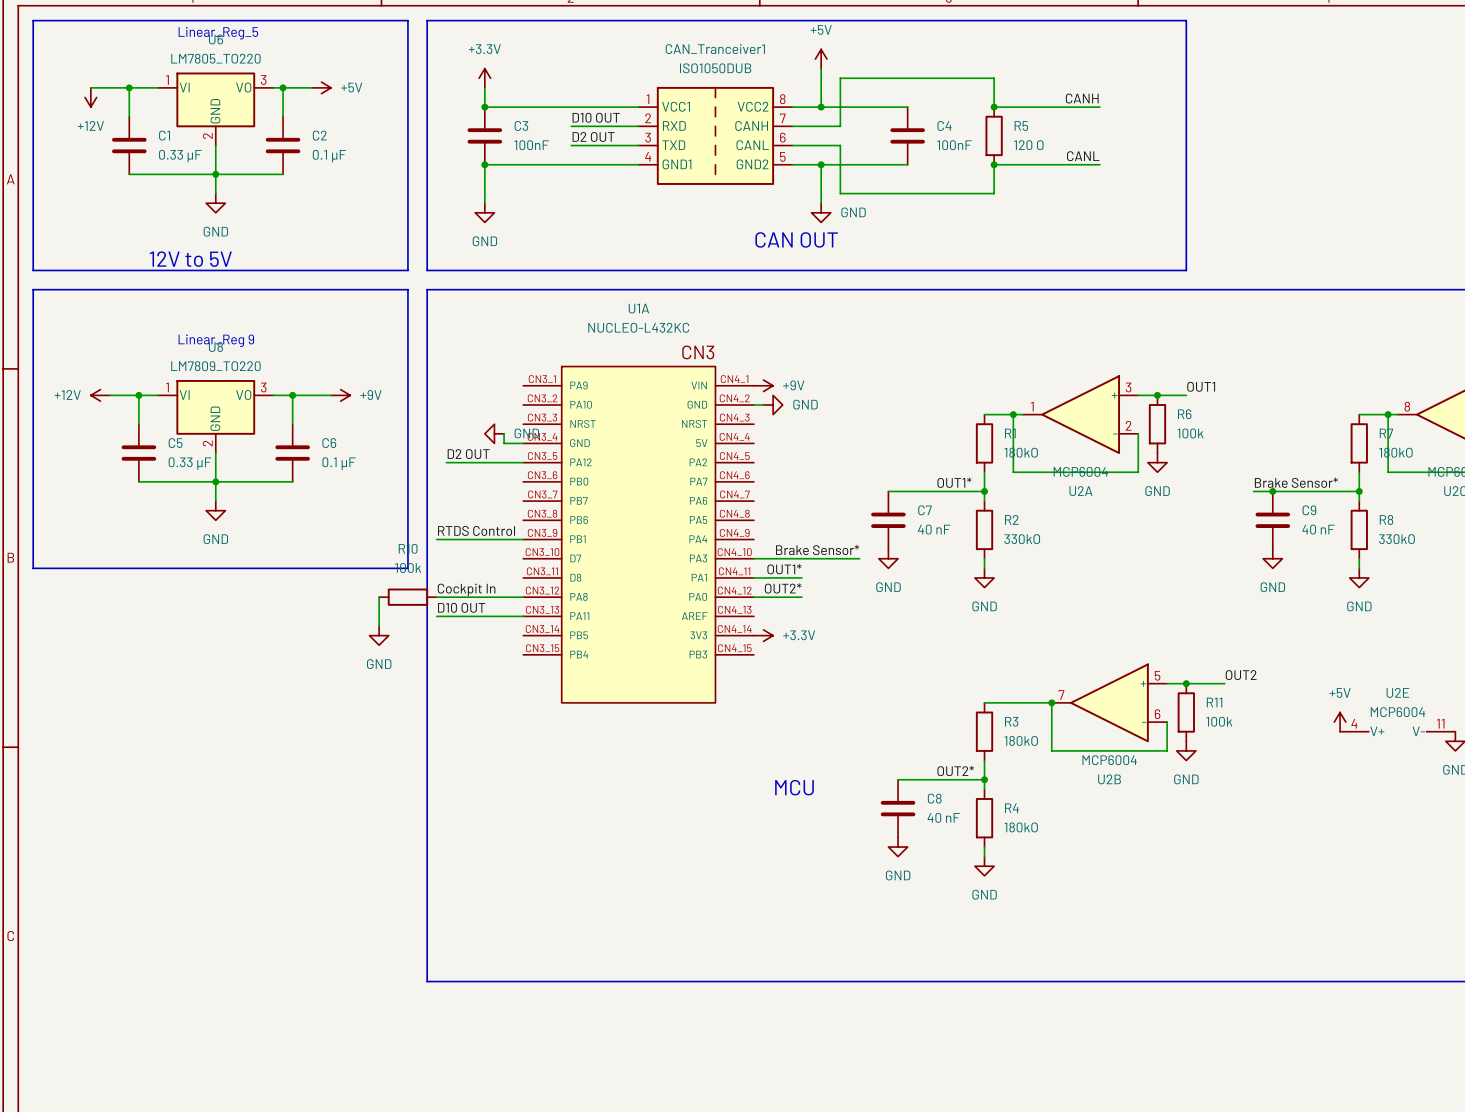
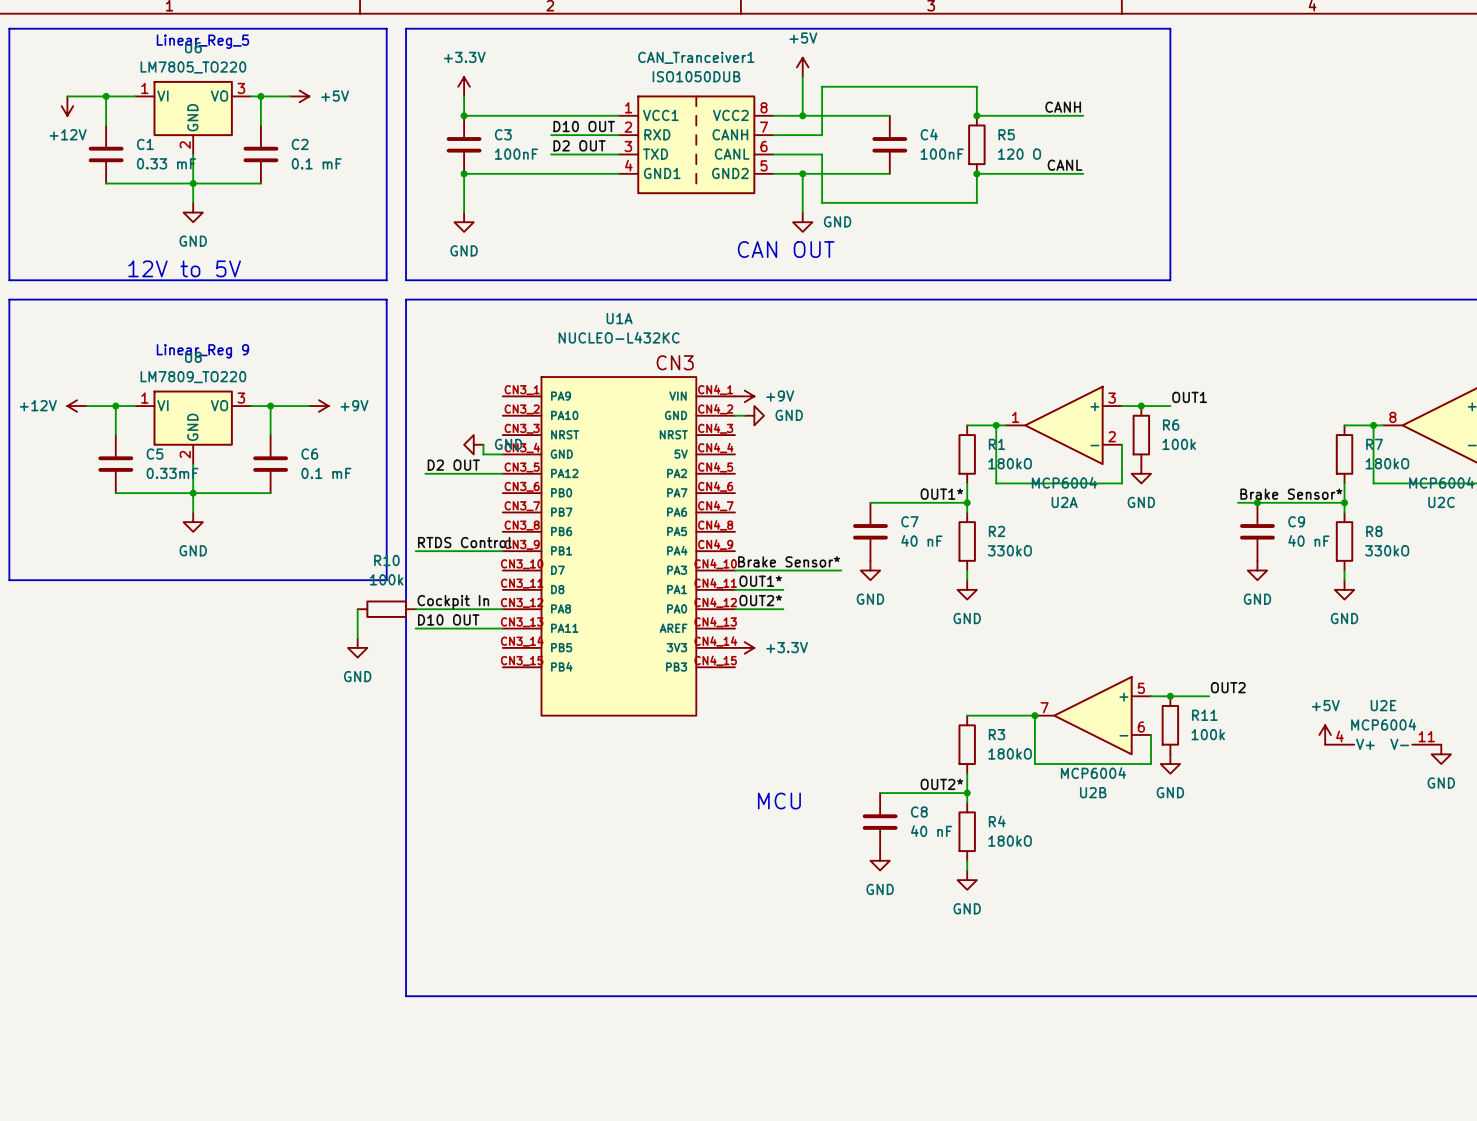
C1 value: 0.33 µF (180, 156) -> 0.33 mF (166, 163)
C2 value: 0.1 µF (329, 156) -> 0.1 mF (316, 163)
C5 value: 0.33 µF (189, 463) -> 0.33mF (172, 473)
C6 value: 0.1 µF (339, 463) -> 0.1 mF (326, 473)

